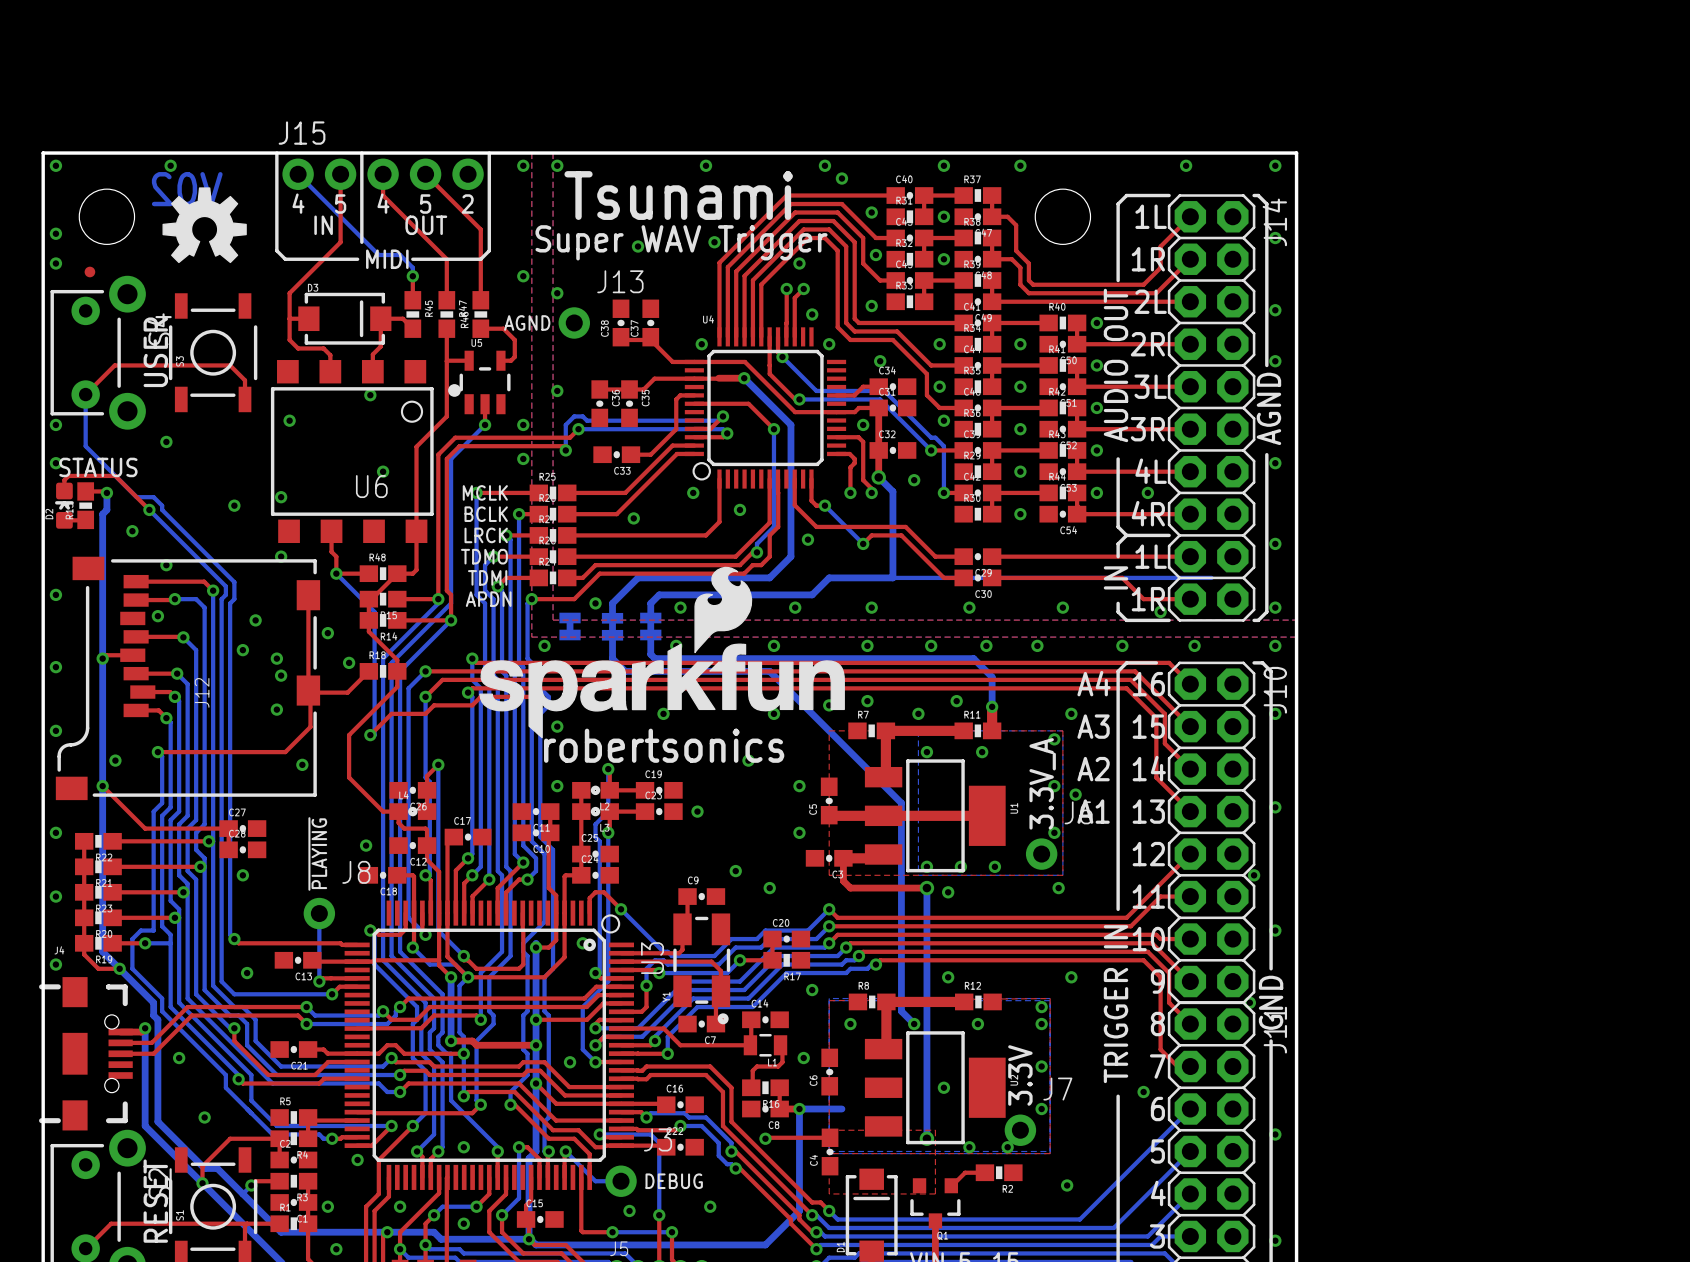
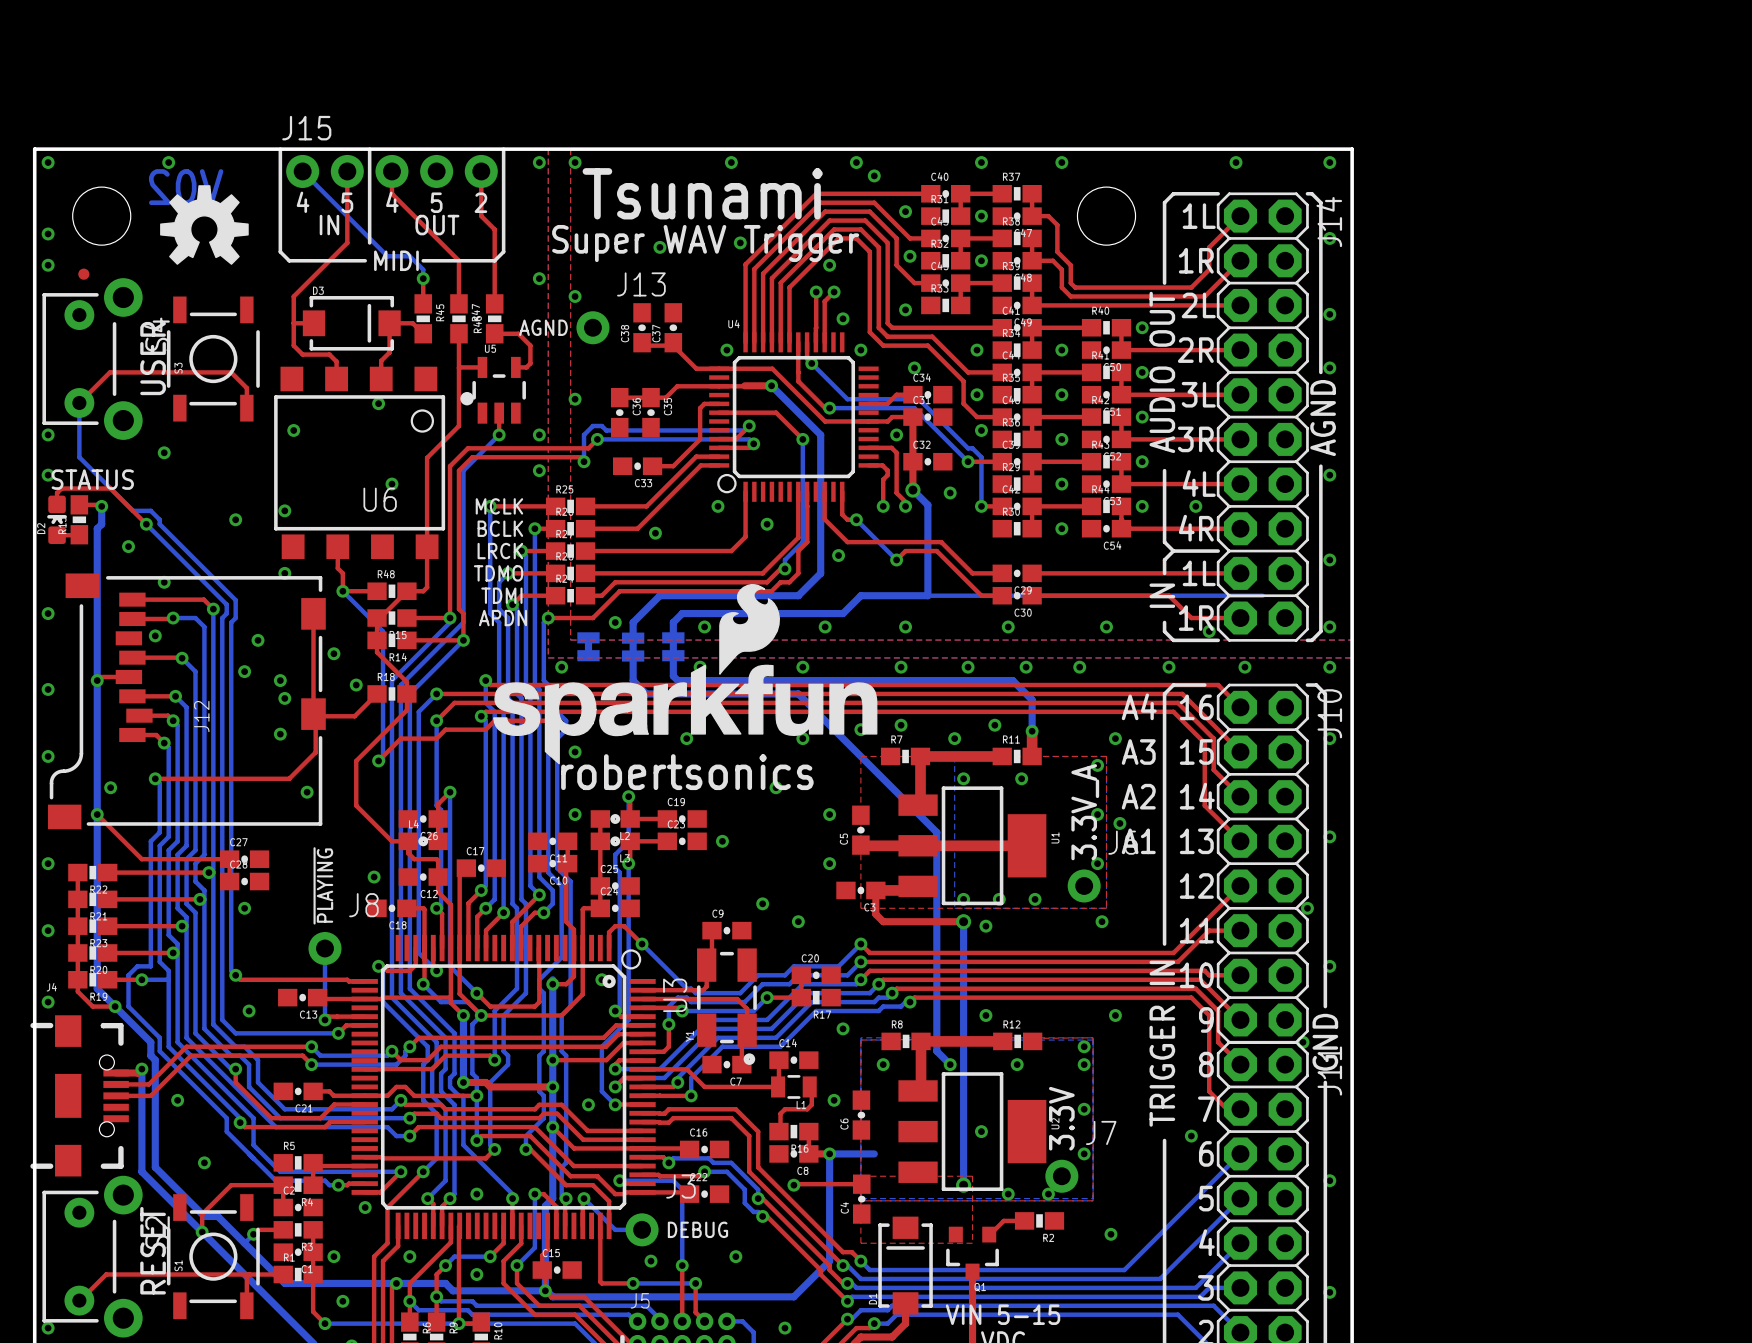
top track: (425, 174) (468, 216) -> (481, 171) (481, 216)

